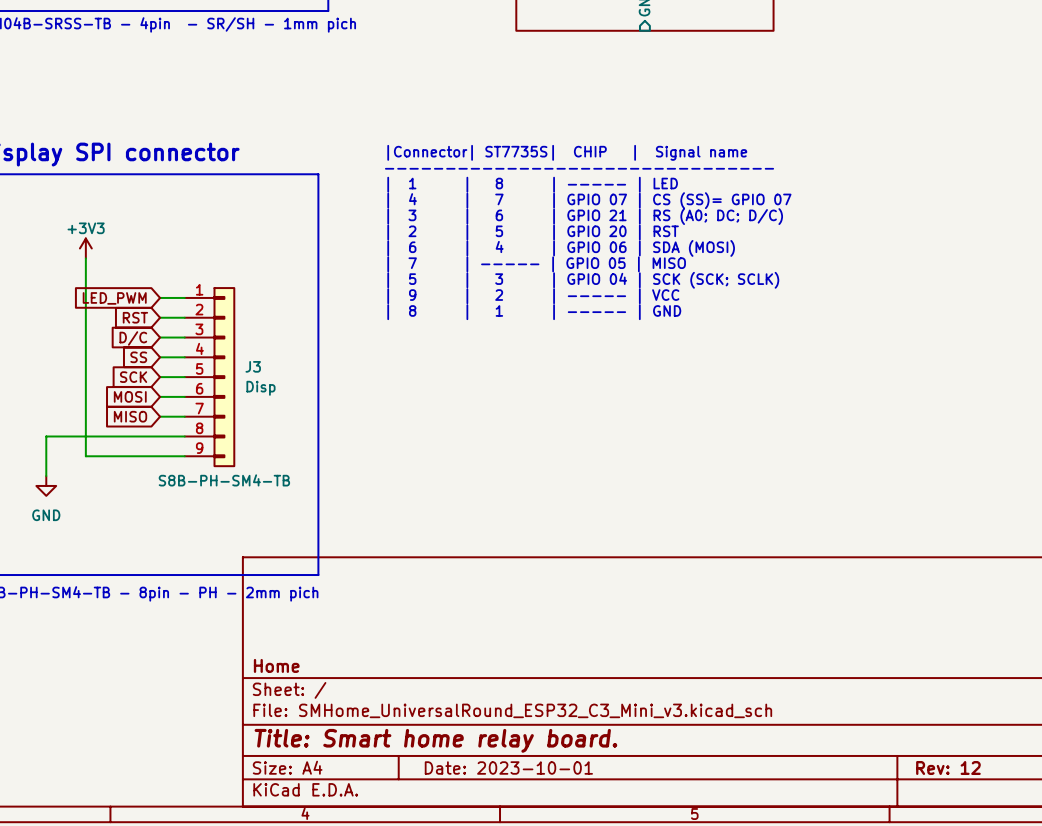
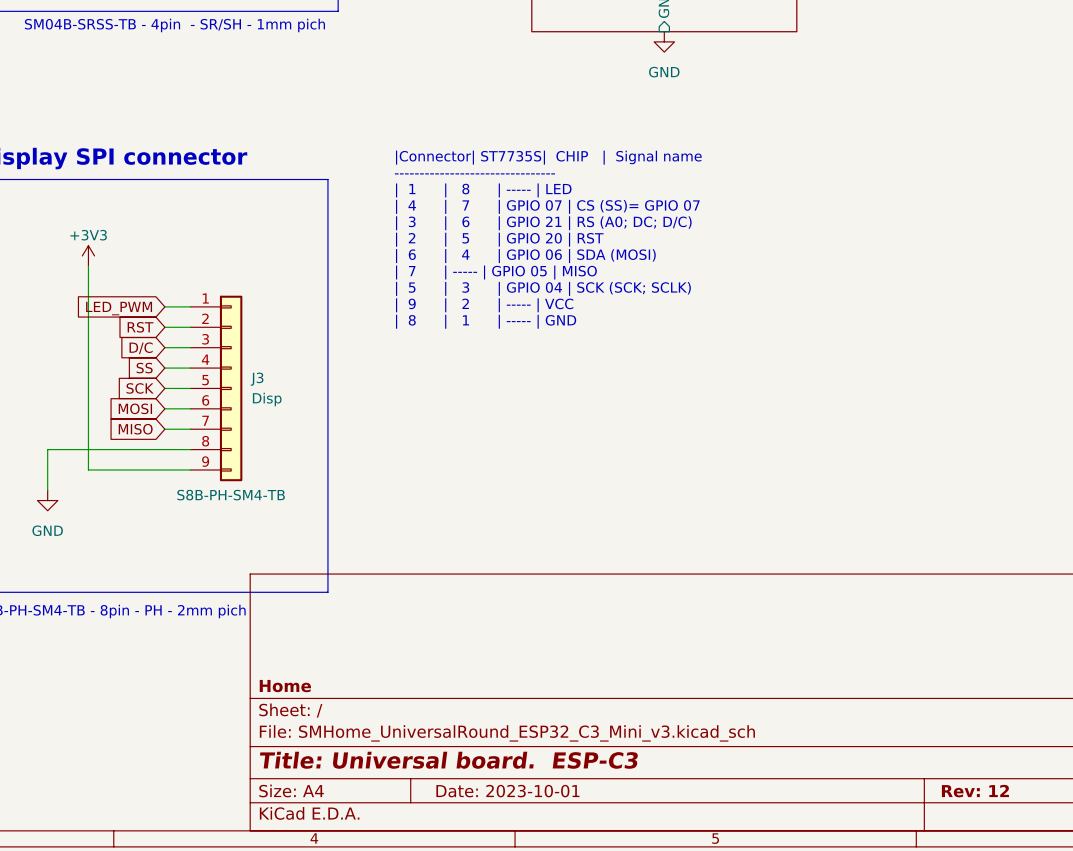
power symbol: none -> GND (664, 41)
title block: Title: Smart home relay board. (435, 740) -> Title: Universal board. ESP-C3 (448, 760)

